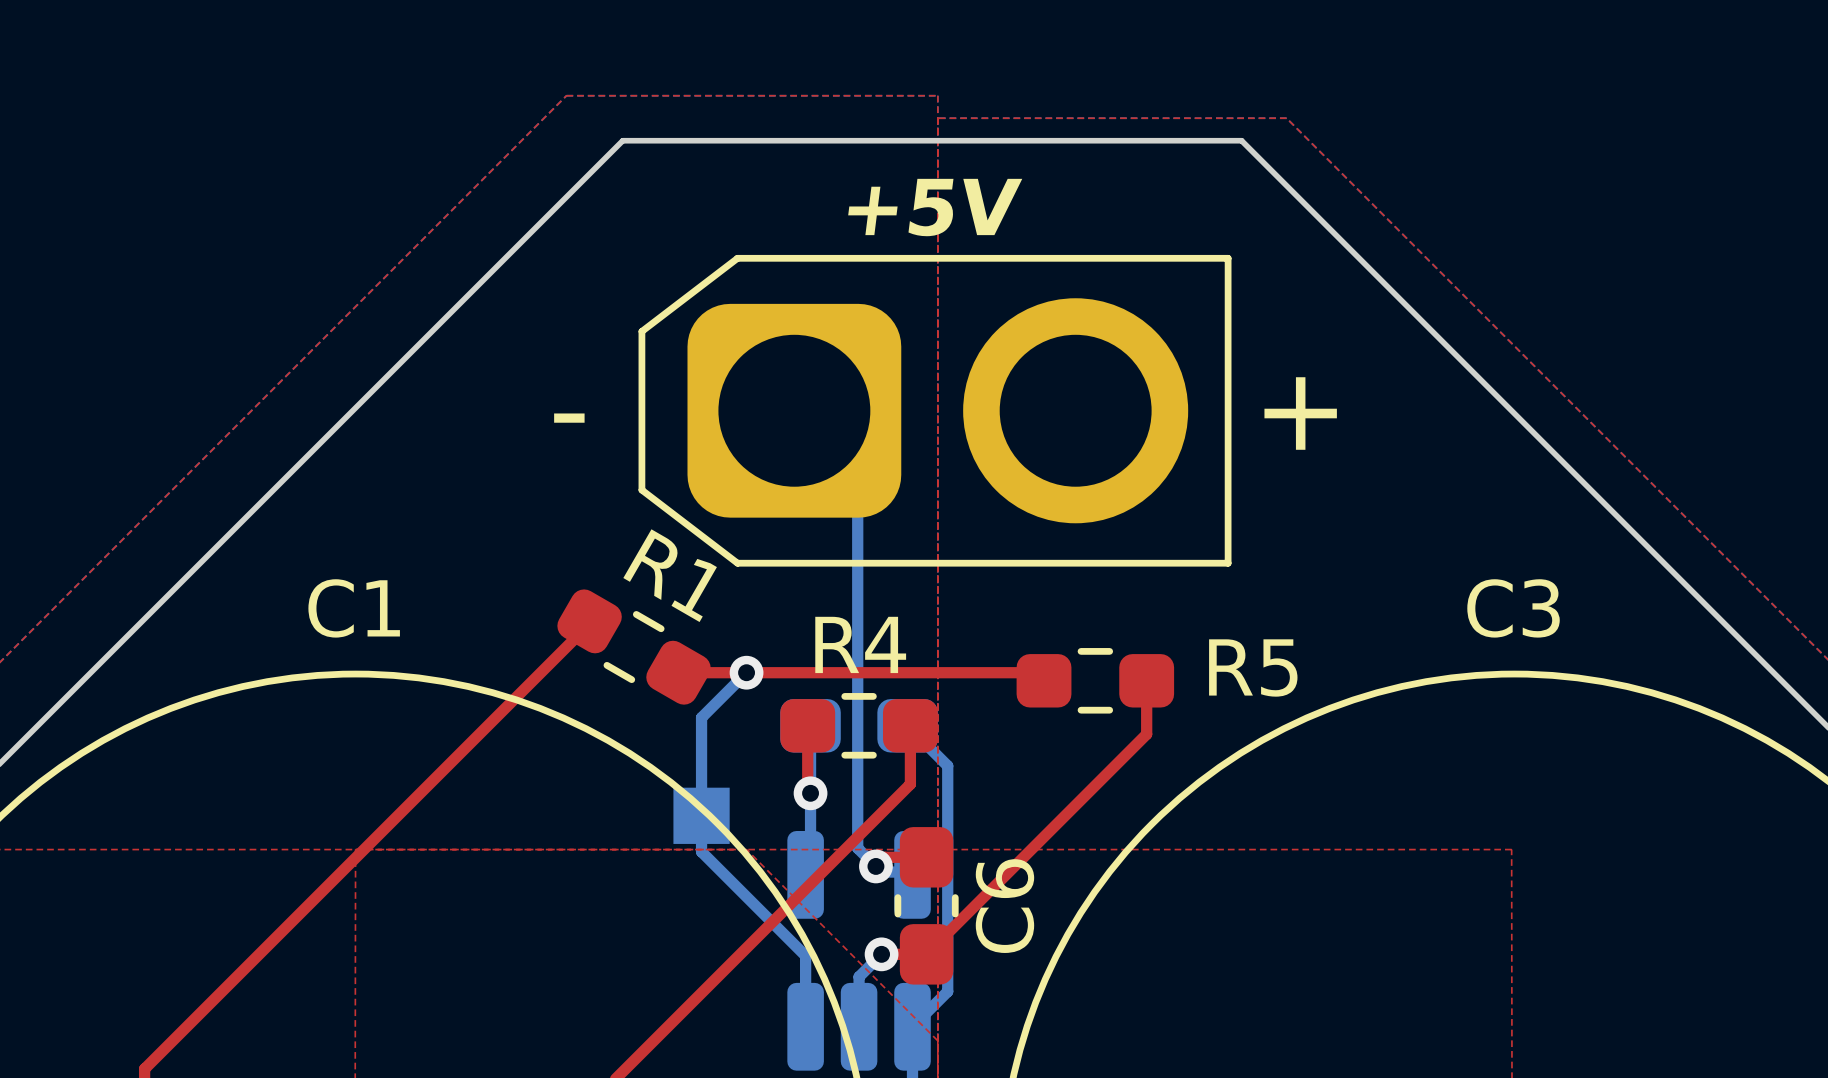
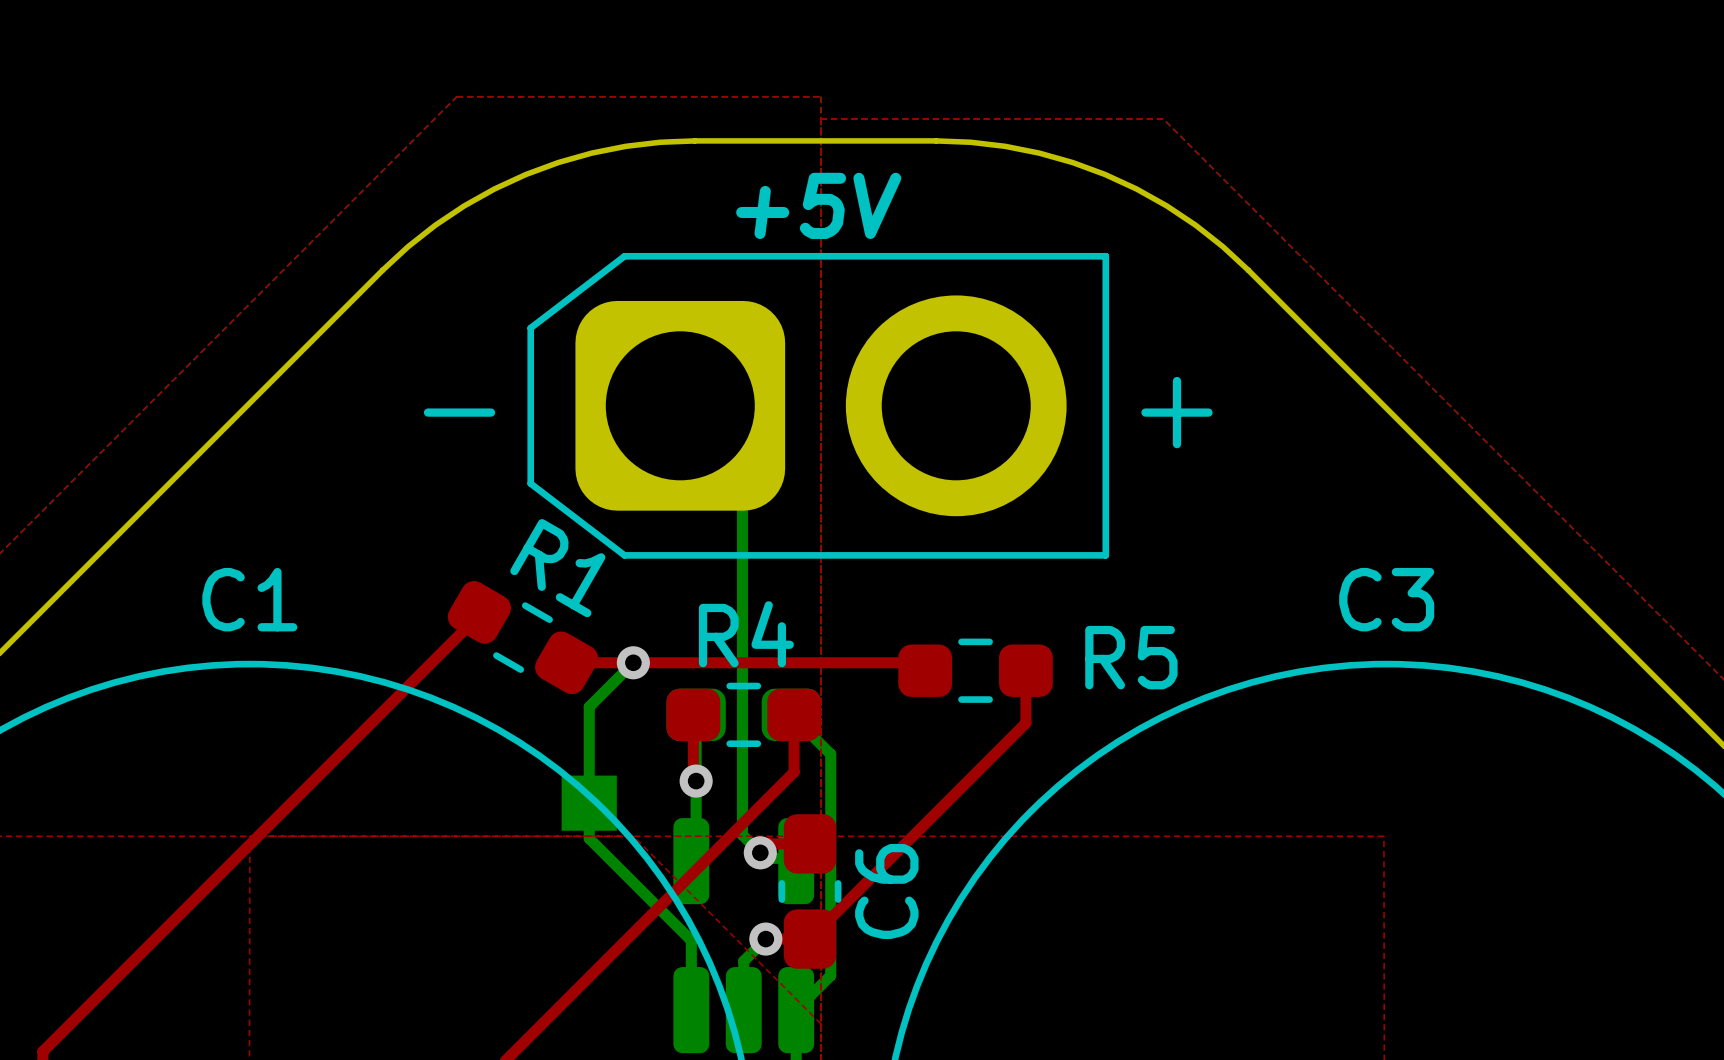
board edge: (809, 140) (622, 140) (490, 272) -> (694, 140) (625, 146) (591, 153) (525, 174) (494, 189) (435, 225) (382, 270)
board edge: (1055, 140) (1241, 140) (1373, 272) -> (936, 140) (1005, 146) (1039, 153) (1105, 174) (1136, 189) (1195, 225) (1248, 270)

